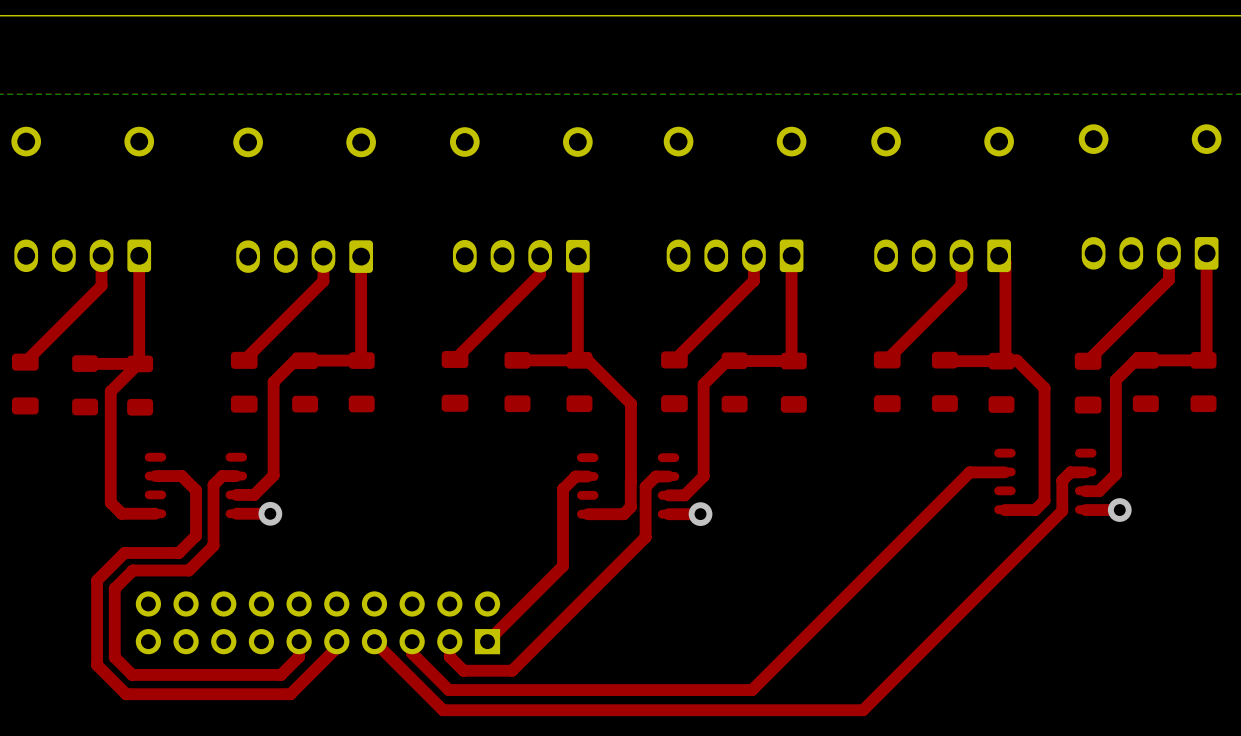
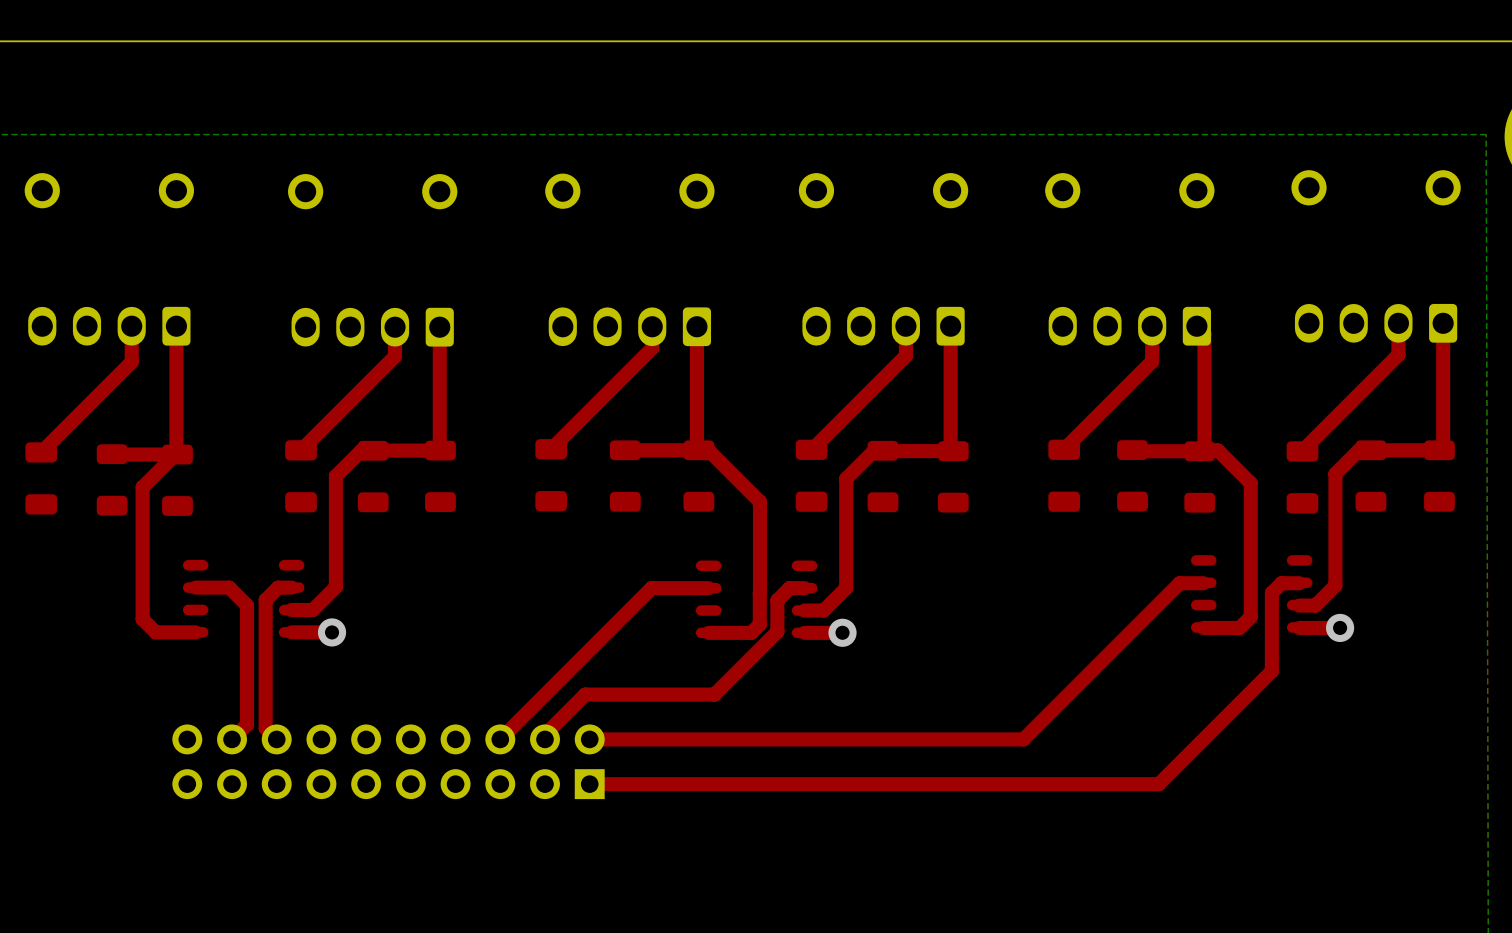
top track: (984, 472) (969, 472) (752, 690) (448, 690) (412, 653) (412, 641) -> (1179, 583) (1023, 739) (589, 739)
top track: (181, 476) (196, 490) (196, 535) (178, 552) (124, 552) (97, 580) (97, 665) (126, 694) (290, 694) (336, 647) (336, 641) -> (226, 587) (229, 587) (247, 605) (247, 724) (232, 739)
top track: (224, 476) (222, 476) (213, 484) (213, 545) (188, 570) (132, 570) (114, 588) (114, 657) (132, 674) (281, 674) (299, 656) (299, 641) -> (278, 587) (265, 600) (265, 728) (276, 739)
top track: (575, 476) (563, 489) (563, 566) (487, 641) -> (694, 588) (651, 588) (500, 739)
top track: (1062, 511) (863, 710) (443, 710) (374, 641) -> (1271, 629) (1271, 671) (1158, 784) (589, 784)
top track: (645, 513) (645, 537) (512, 670) (463, 670) (449, 656) (449, 641) -> (777, 631) (714, 694) (585, 694) (545, 734)

